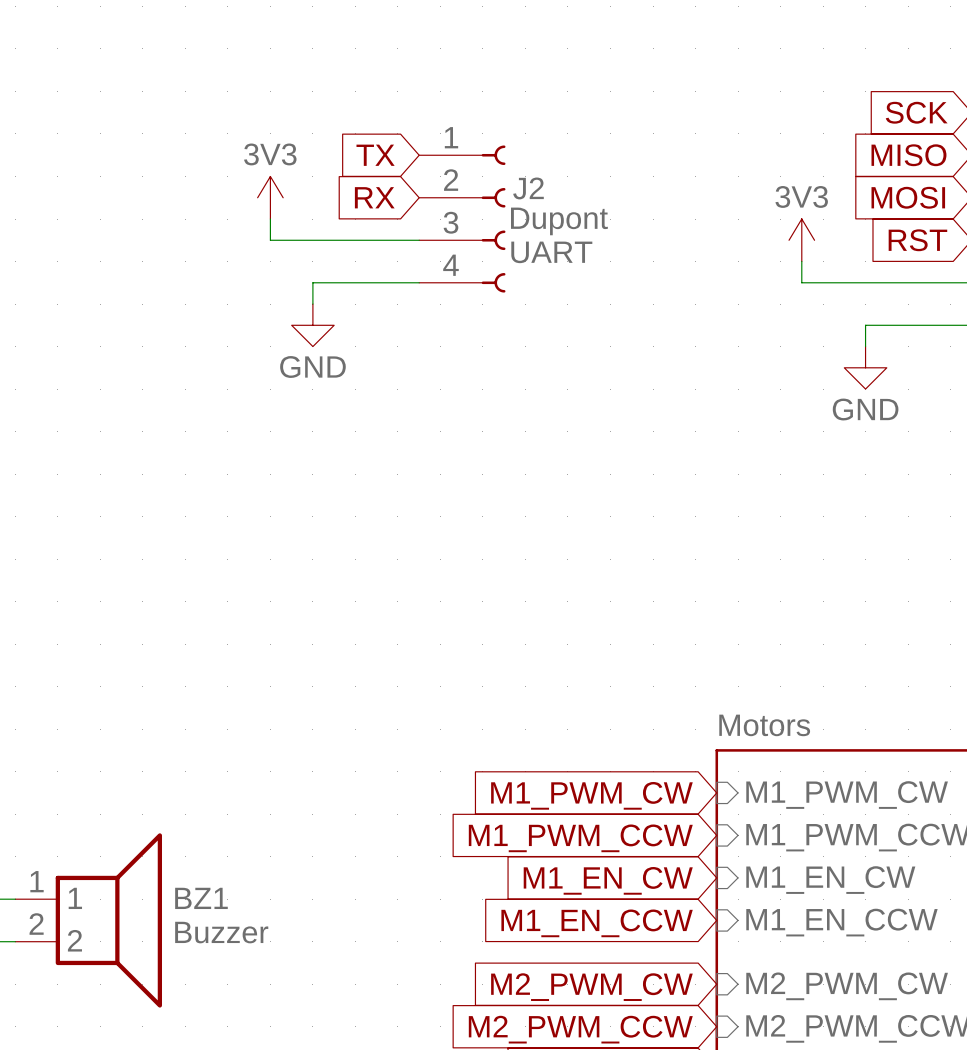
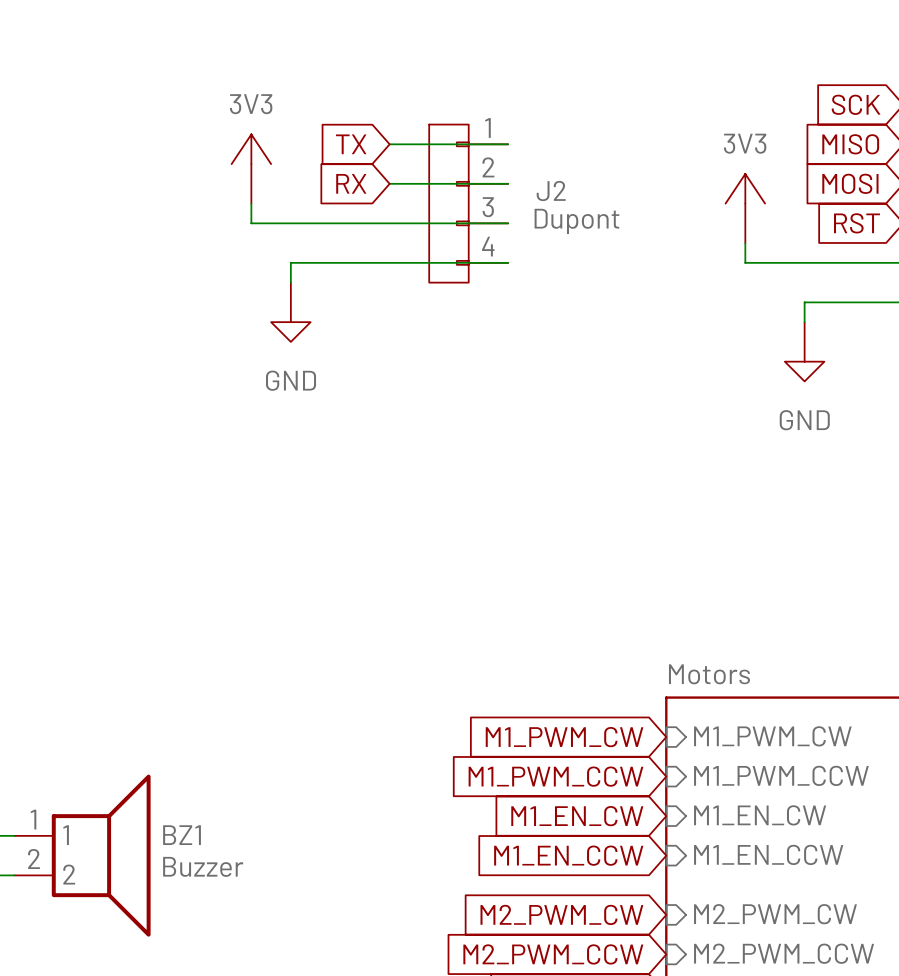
J2 symbol: [419, 145, 506, 293] -> [429, 124, 509, 283]
power symbol shape: [257, 176, 284, 220] -> [231, 134, 272, 204]
power symbol shape: [789, 219, 815, 262] -> [725, 173, 766, 244]
J2 text: UART (551, 252) -> none
power symbol shape: [291, 304, 335, 347] -> [271, 282, 311, 342]
power symbol shape: [844, 346, 887, 390] -> [784, 322, 825, 382]

